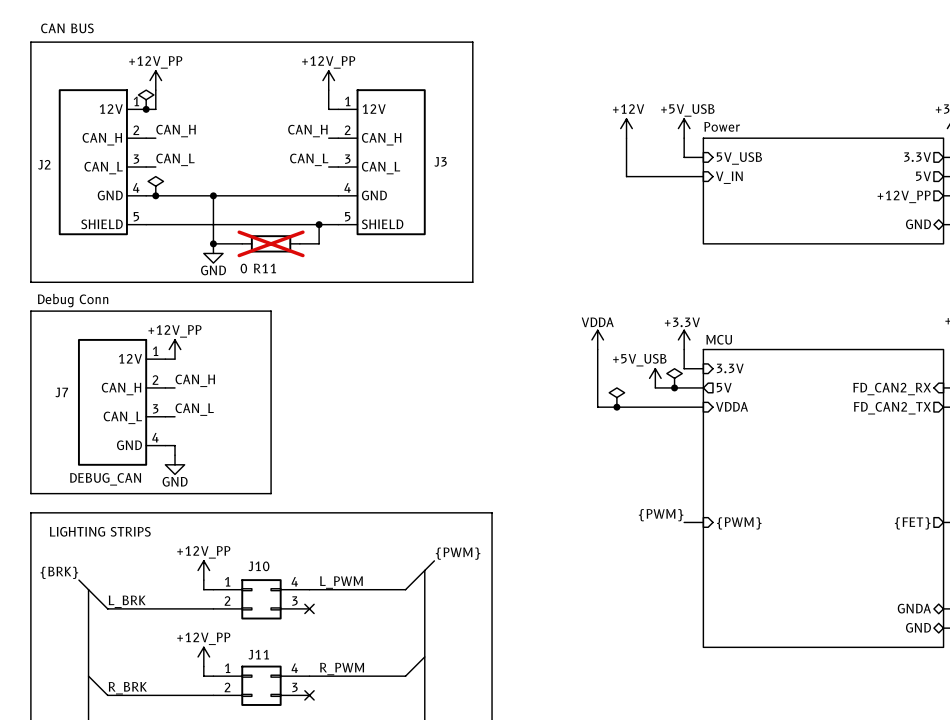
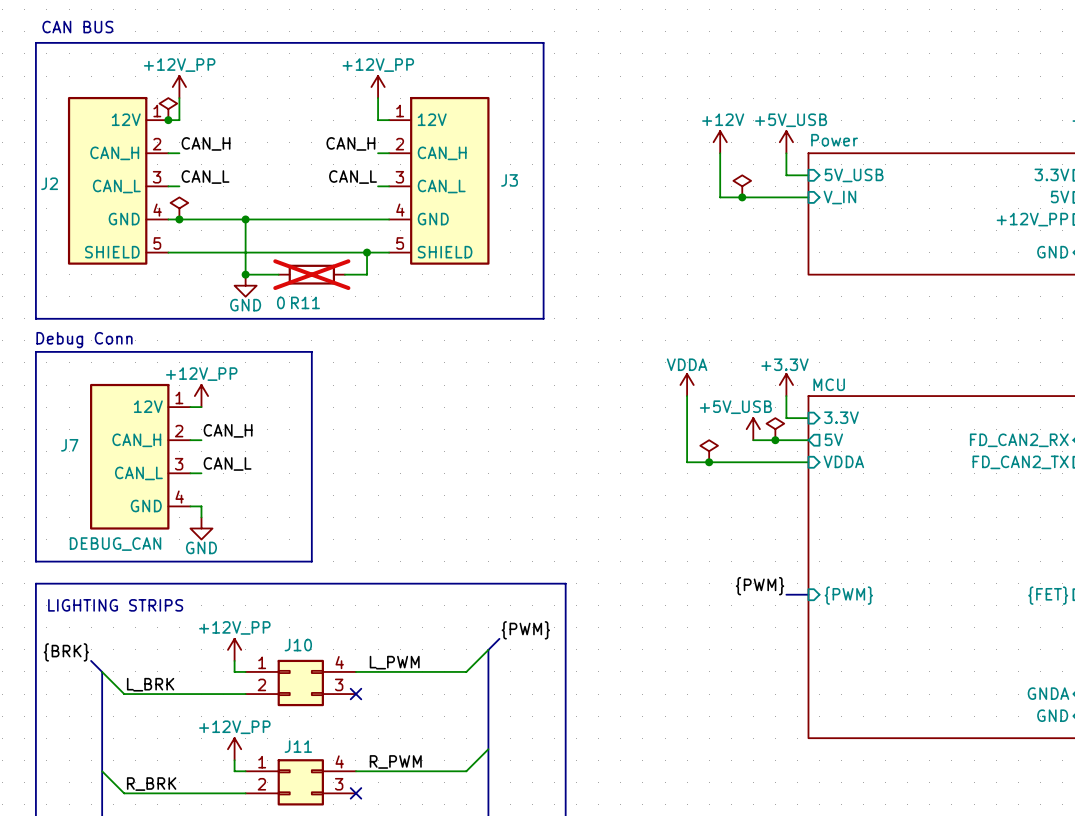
power symbol: none -> (742, 186)
junction: none -> (742, 197)

